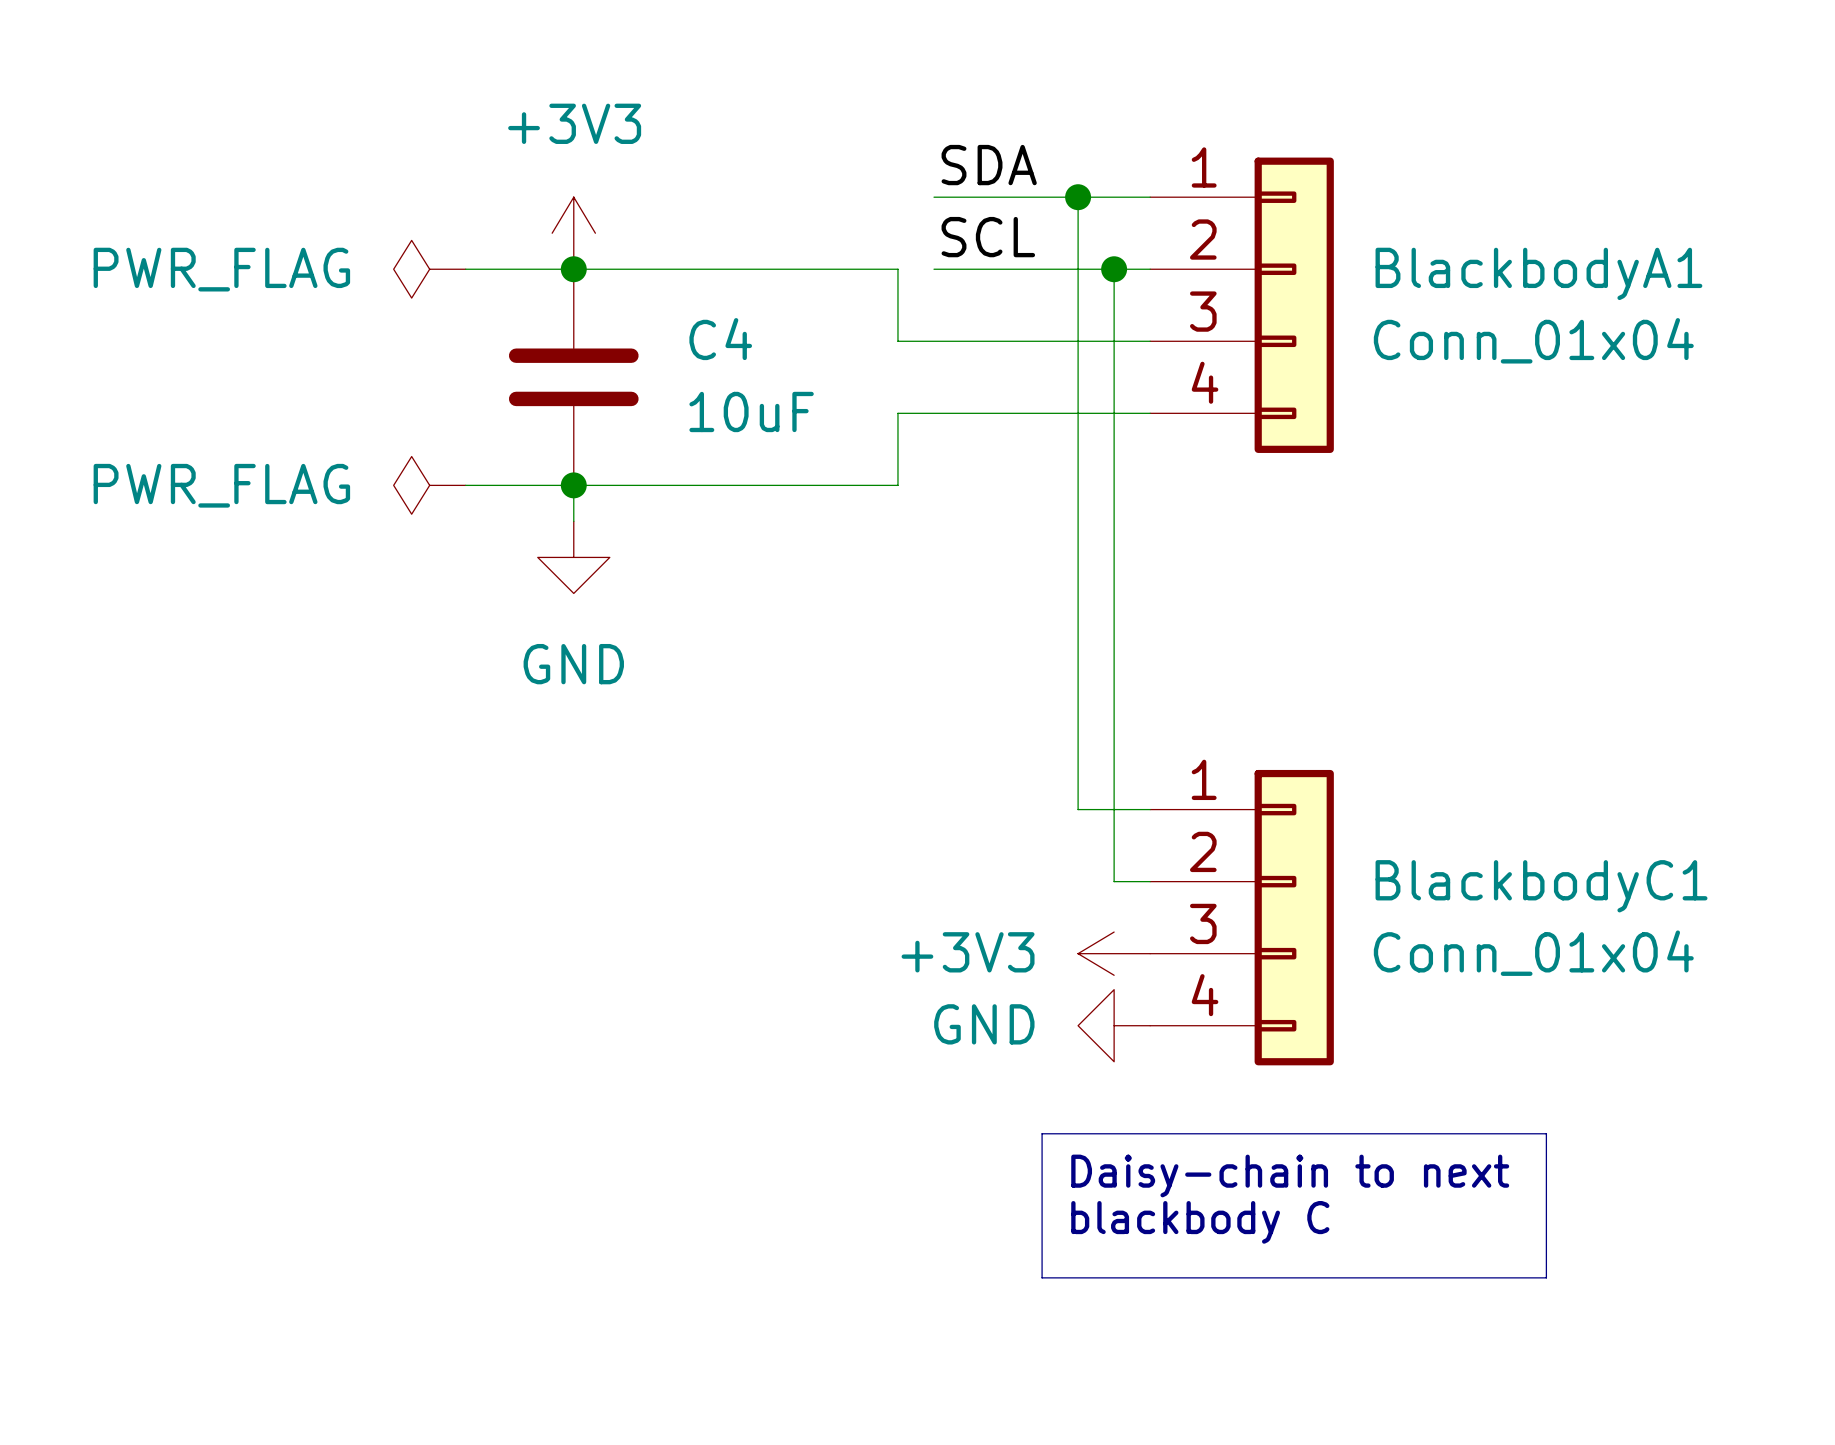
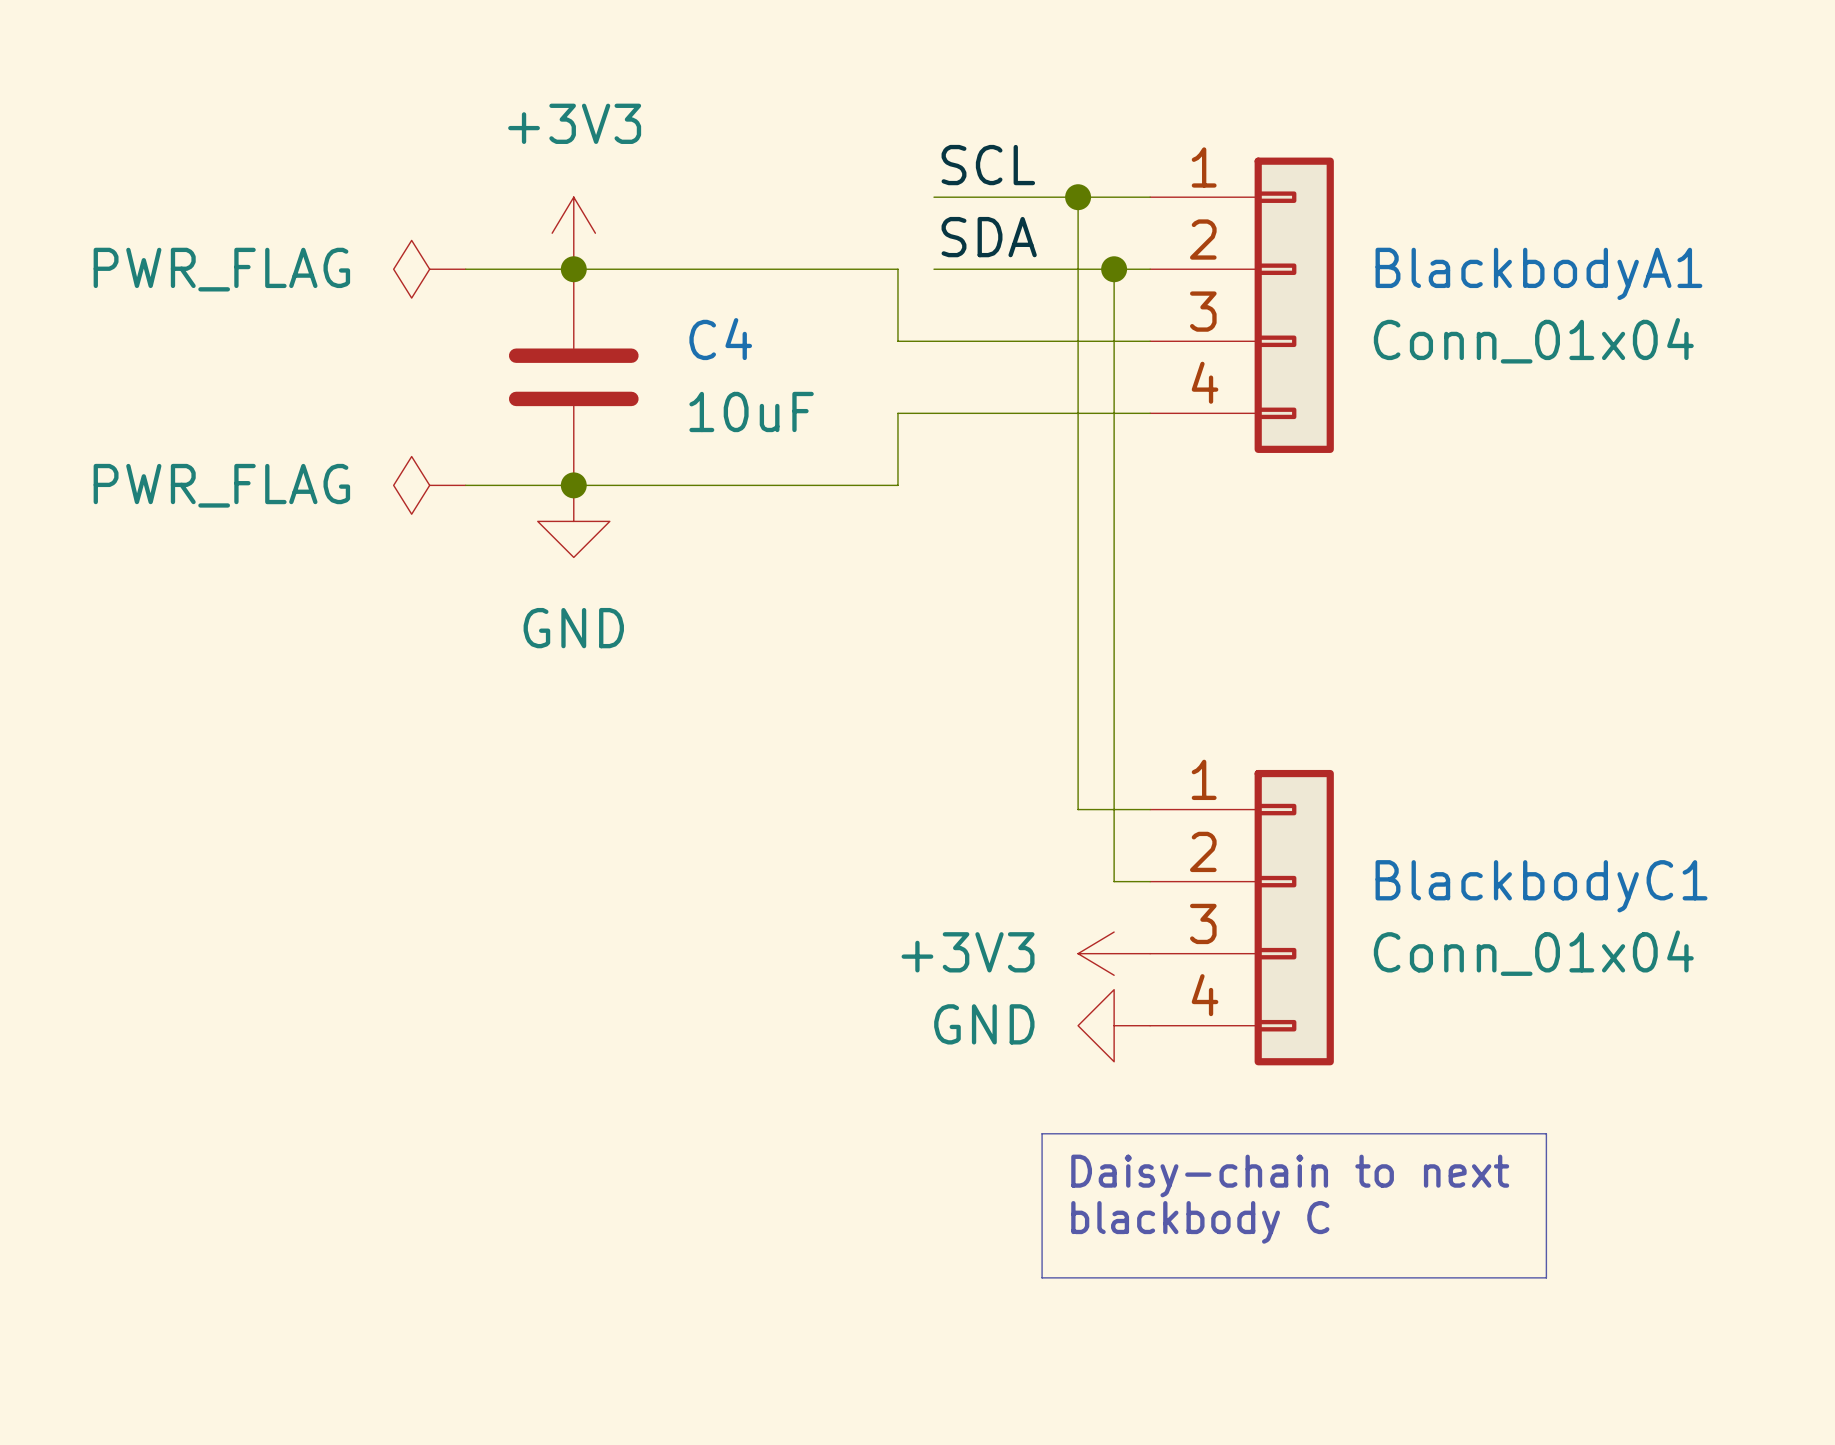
label: SDA (989, 165) -> SCL (988, 165)
label: SCL (988, 237) -> SDA (989, 237)
power symbol position: GND (573, 557) -> GND (573, 521)

